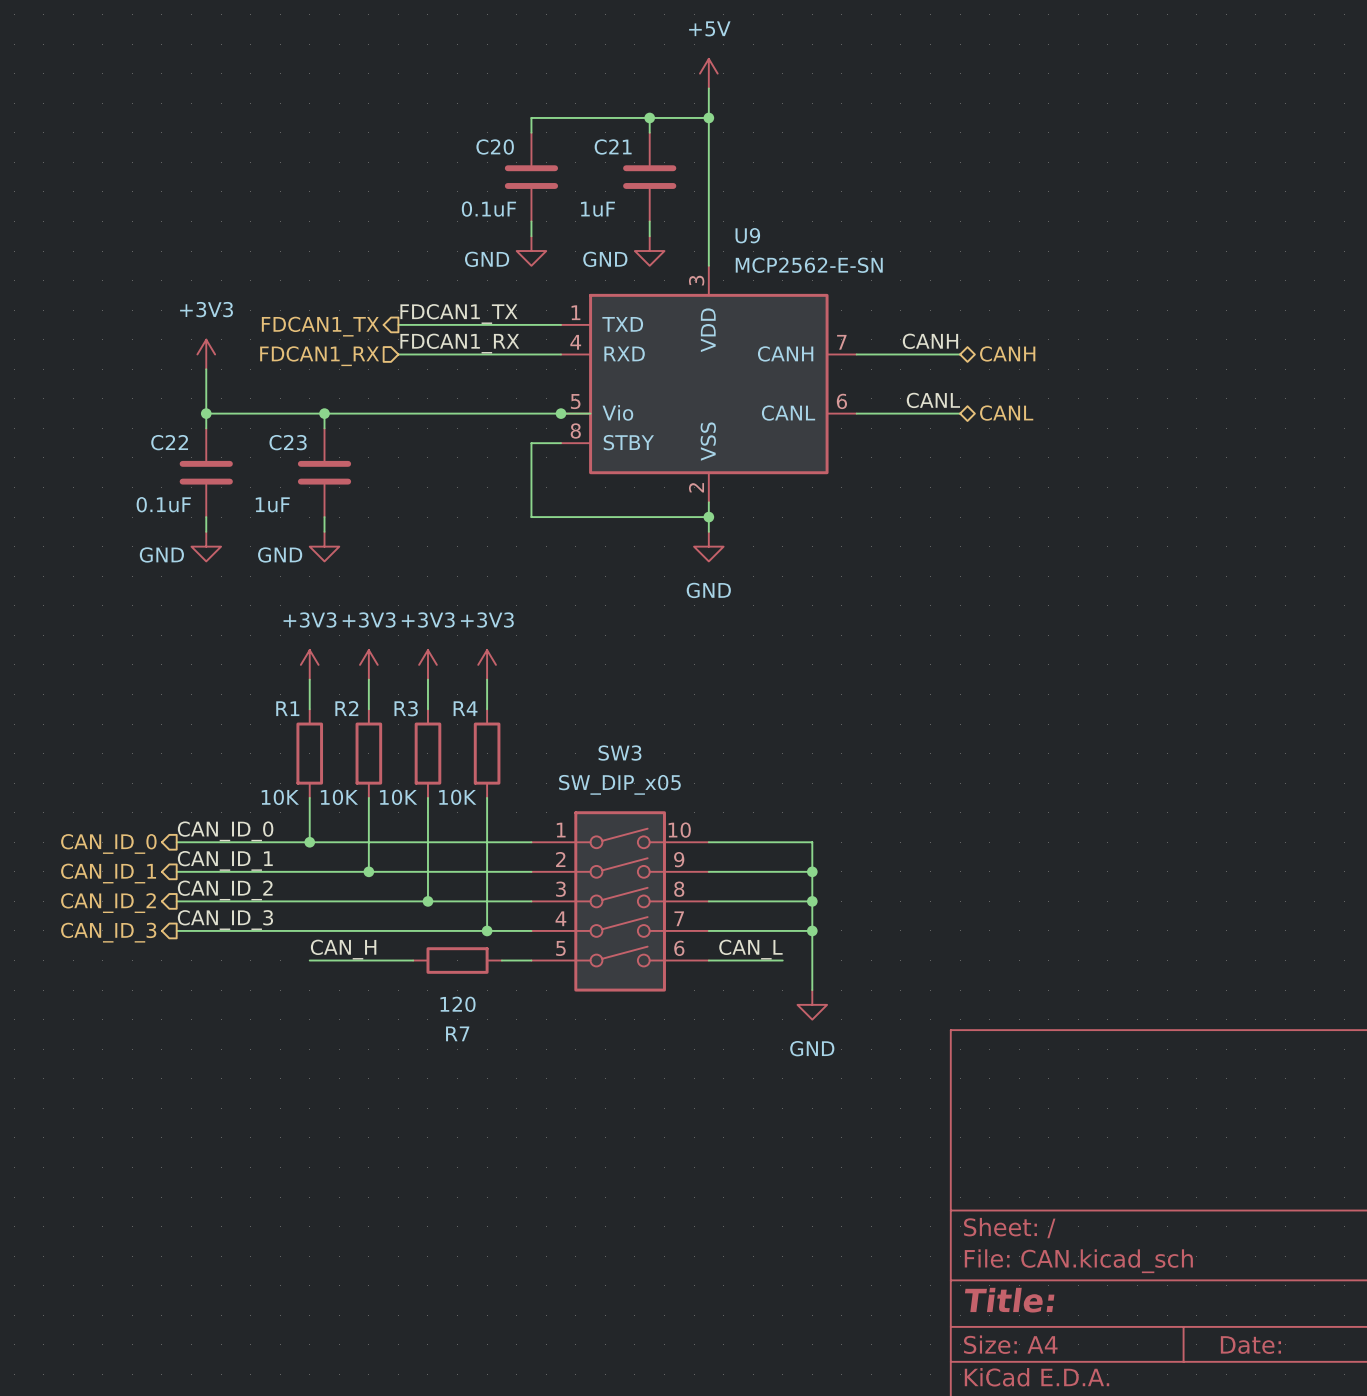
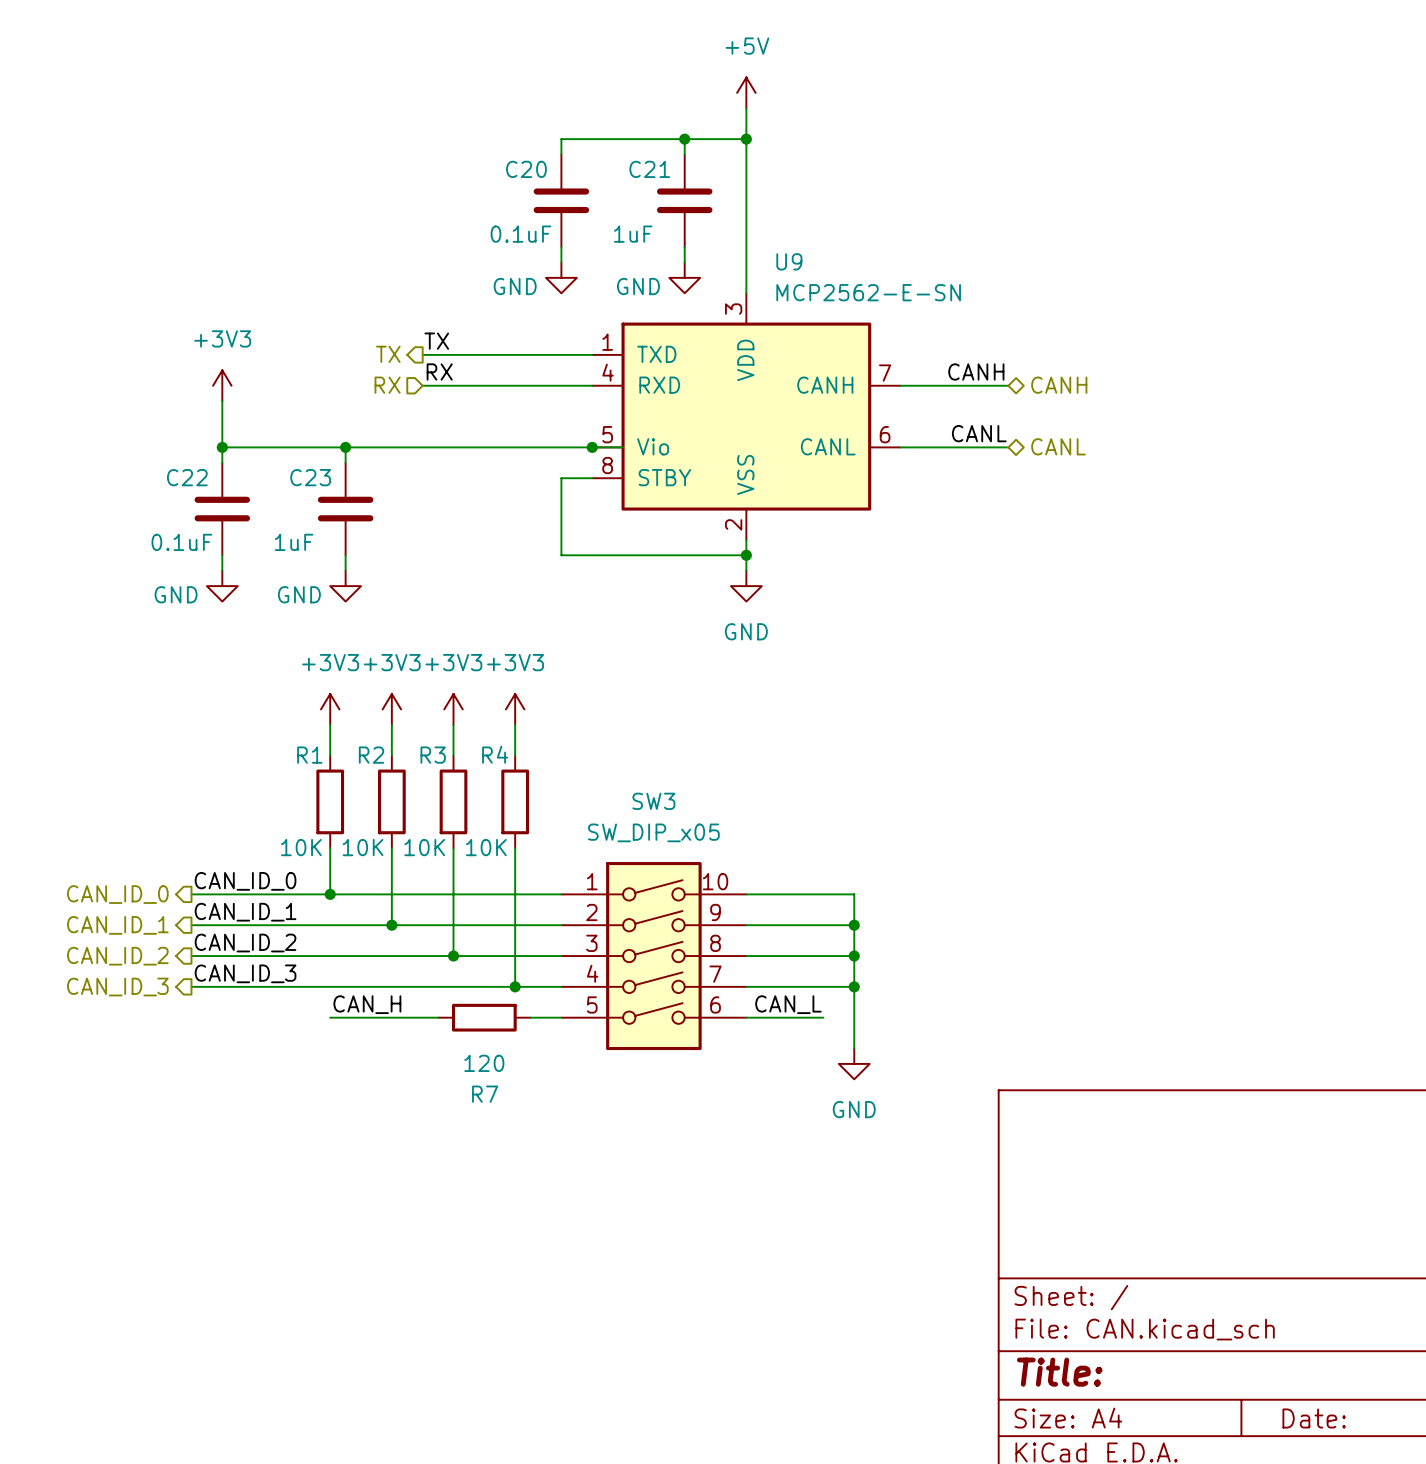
label: FDCAN1_TX (458, 313) -> TX (436, 341)
hierarchical label: FDCAN1_TX (320, 326) -> TX (388, 354)
label: FDCAN1_RX (459, 343) -> RX (439, 371)
hierarchical label: FDCAN1_RX (319, 356) -> RX (387, 385)

